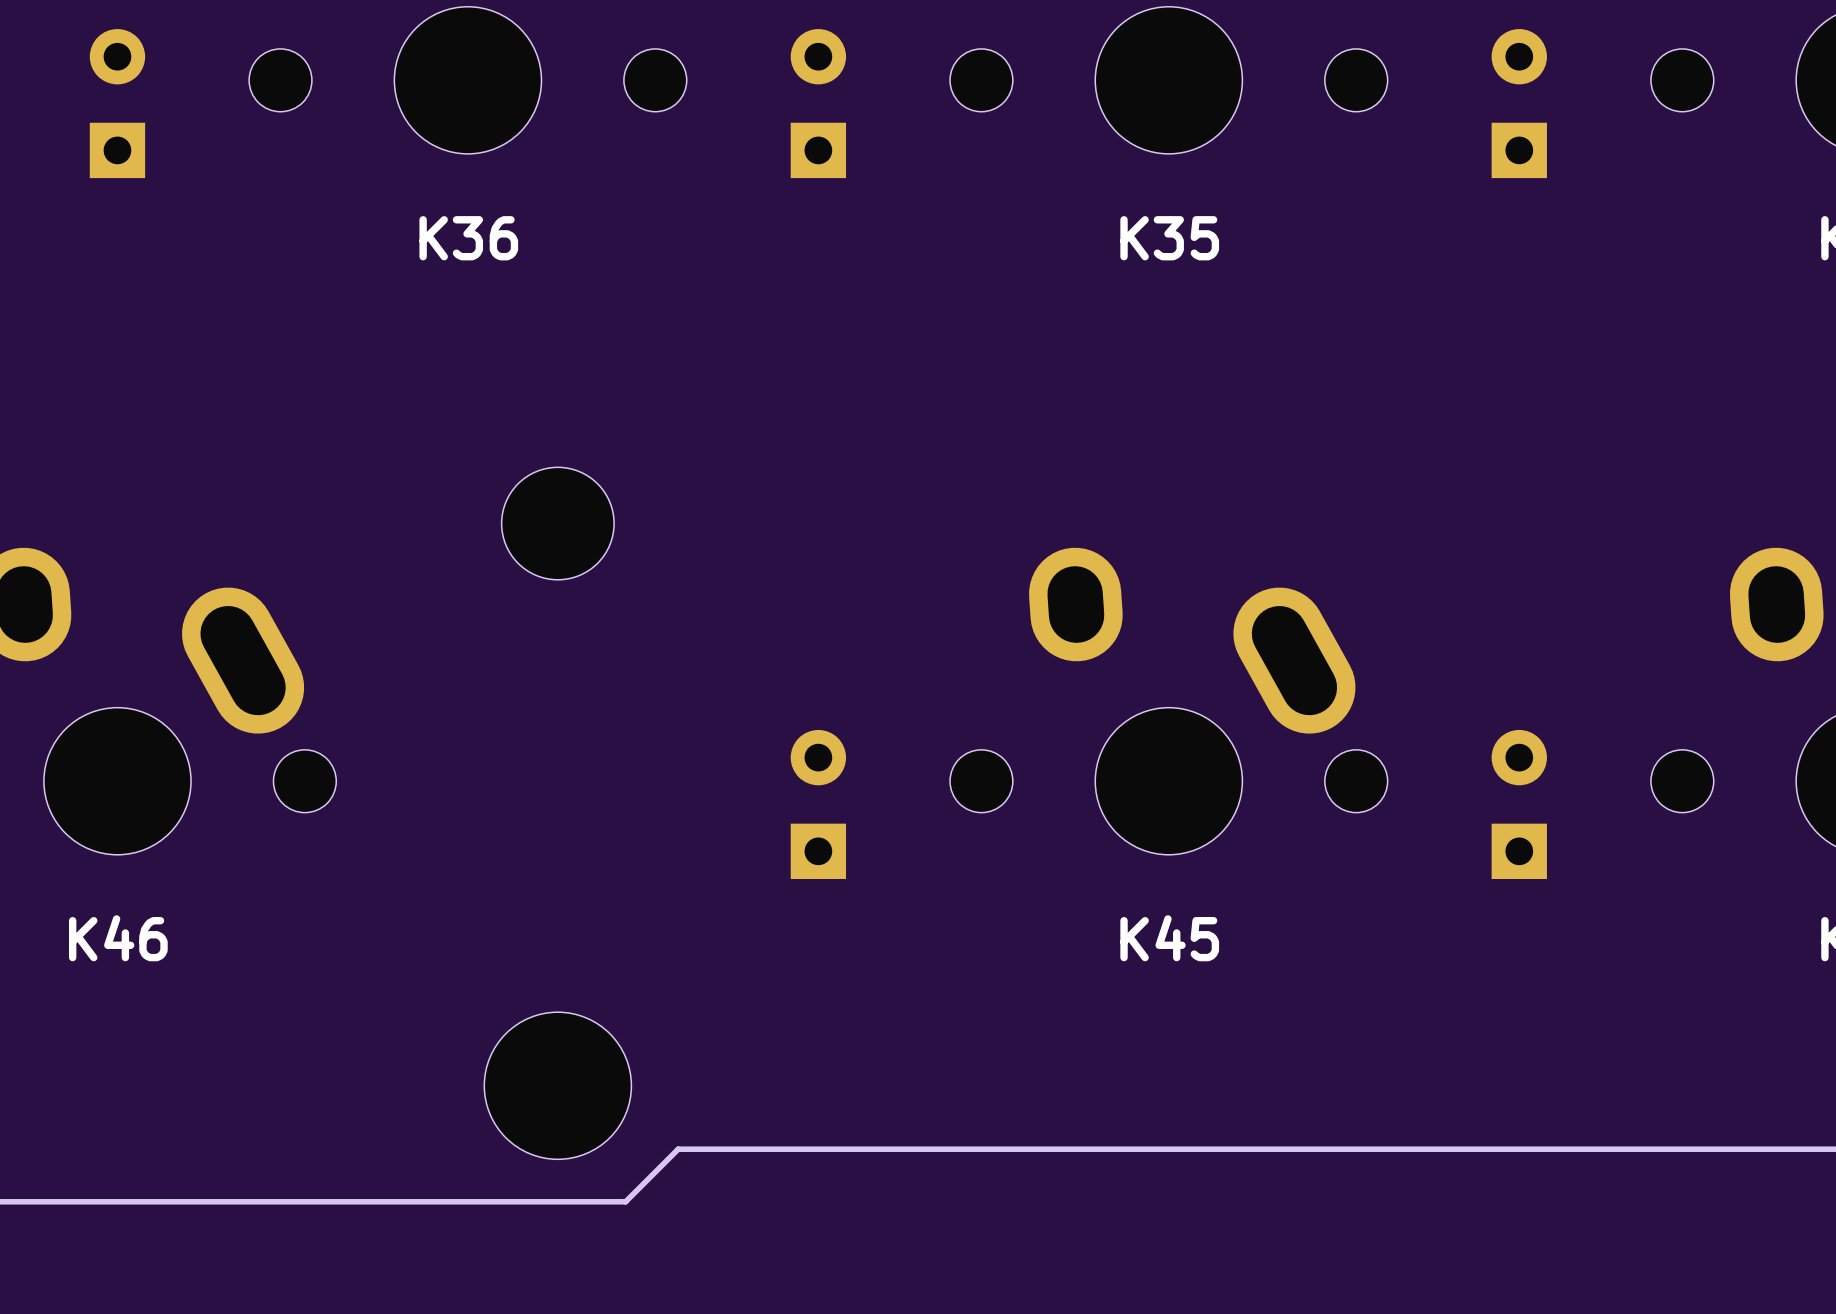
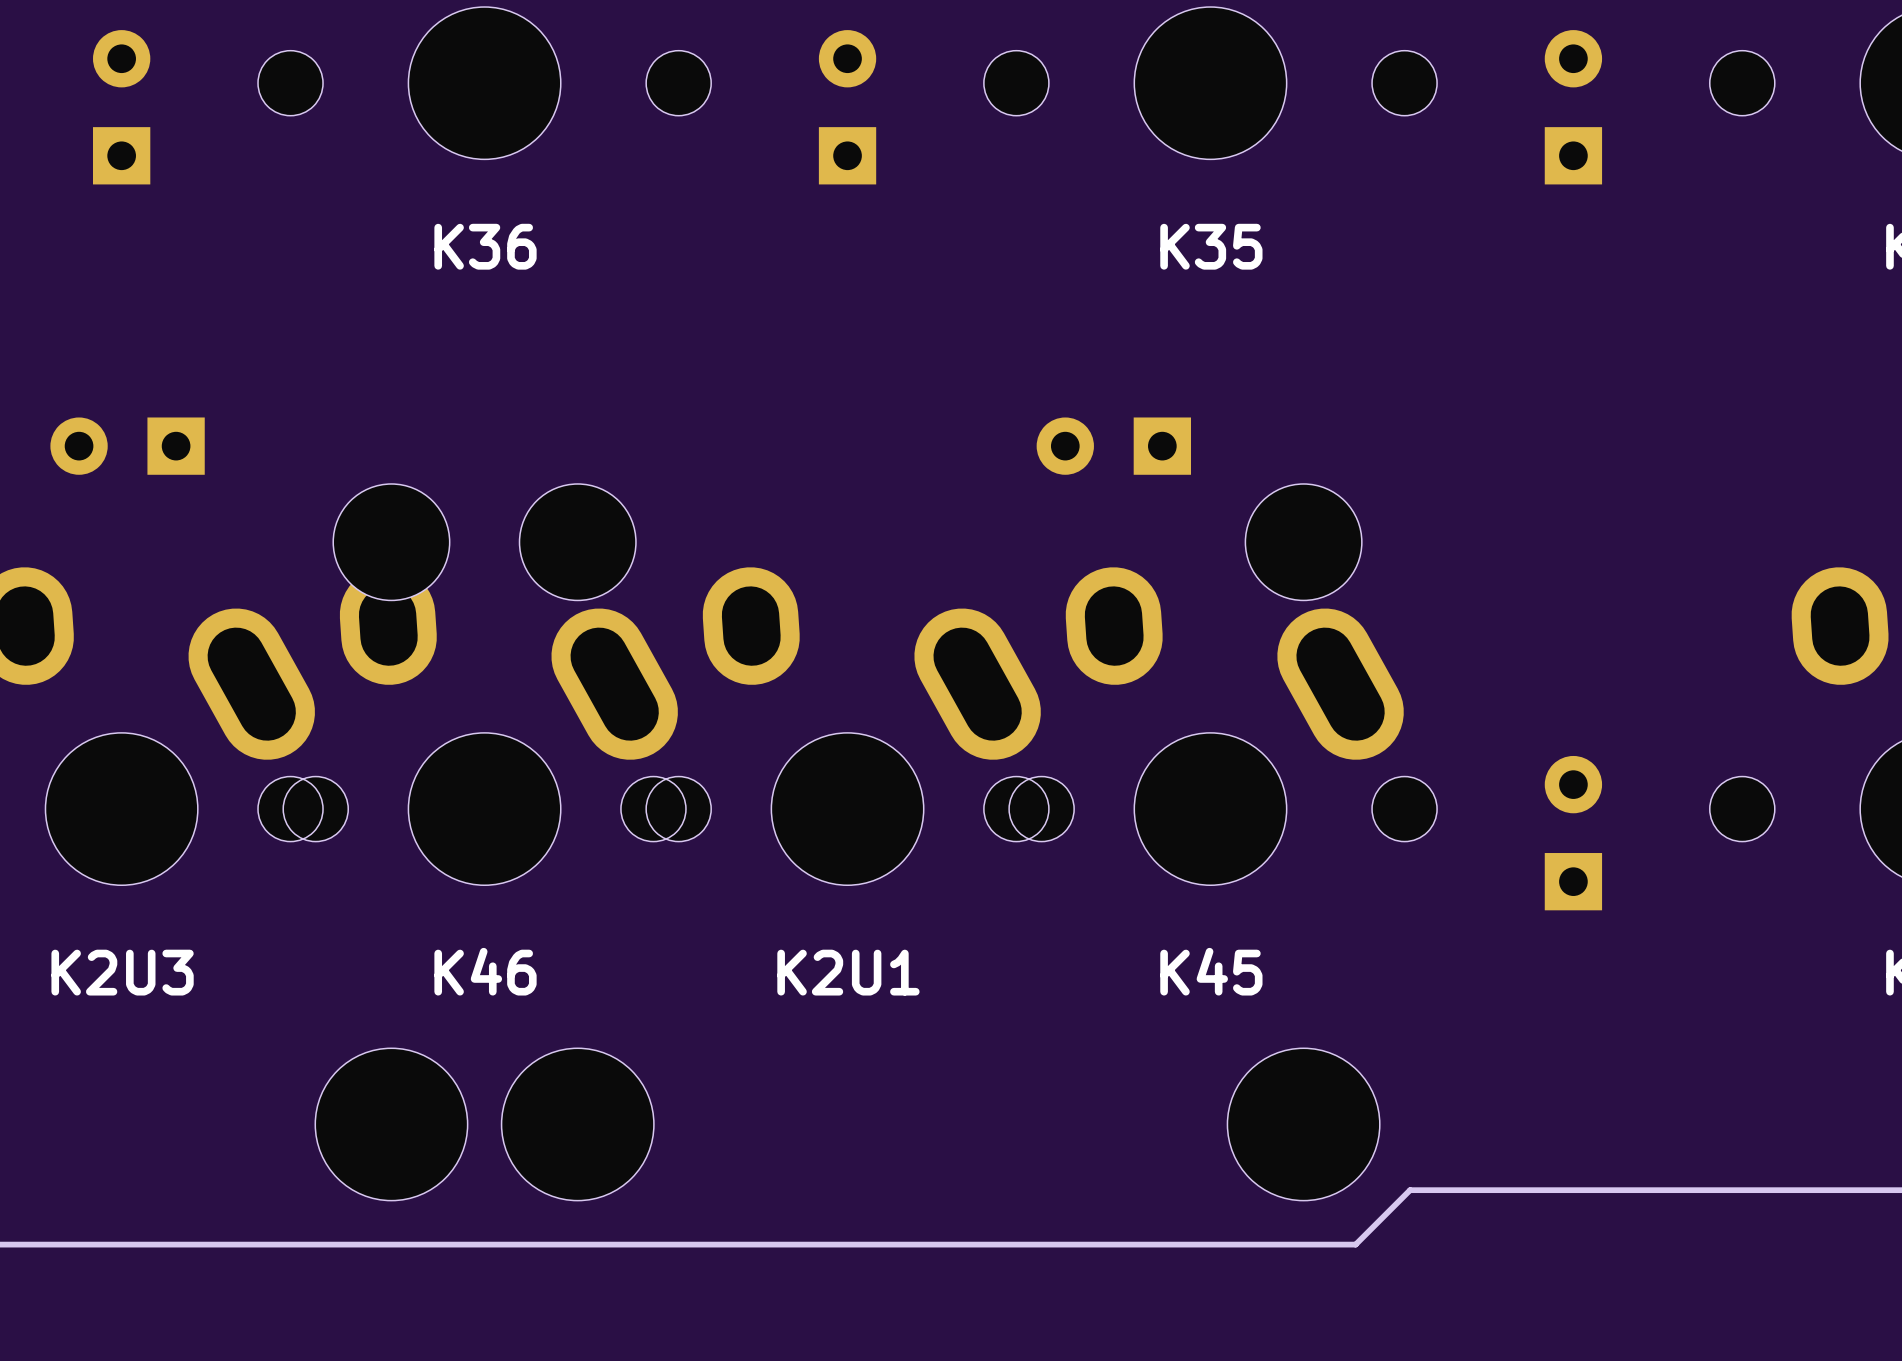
part: none -> (127, 446)
part: none -> (1113, 446)
K46: none -> (484, 726)
part: (818, 804) -> none
K2U1: none -> (847, 842)
K46 name: K46 (118, 938) -> K2U3 (122, 972)
board edge: (1361, 1149) (678, 1149) (625, 1201) -> (1410, 1190) (1355, 1244) (647, 1244)

